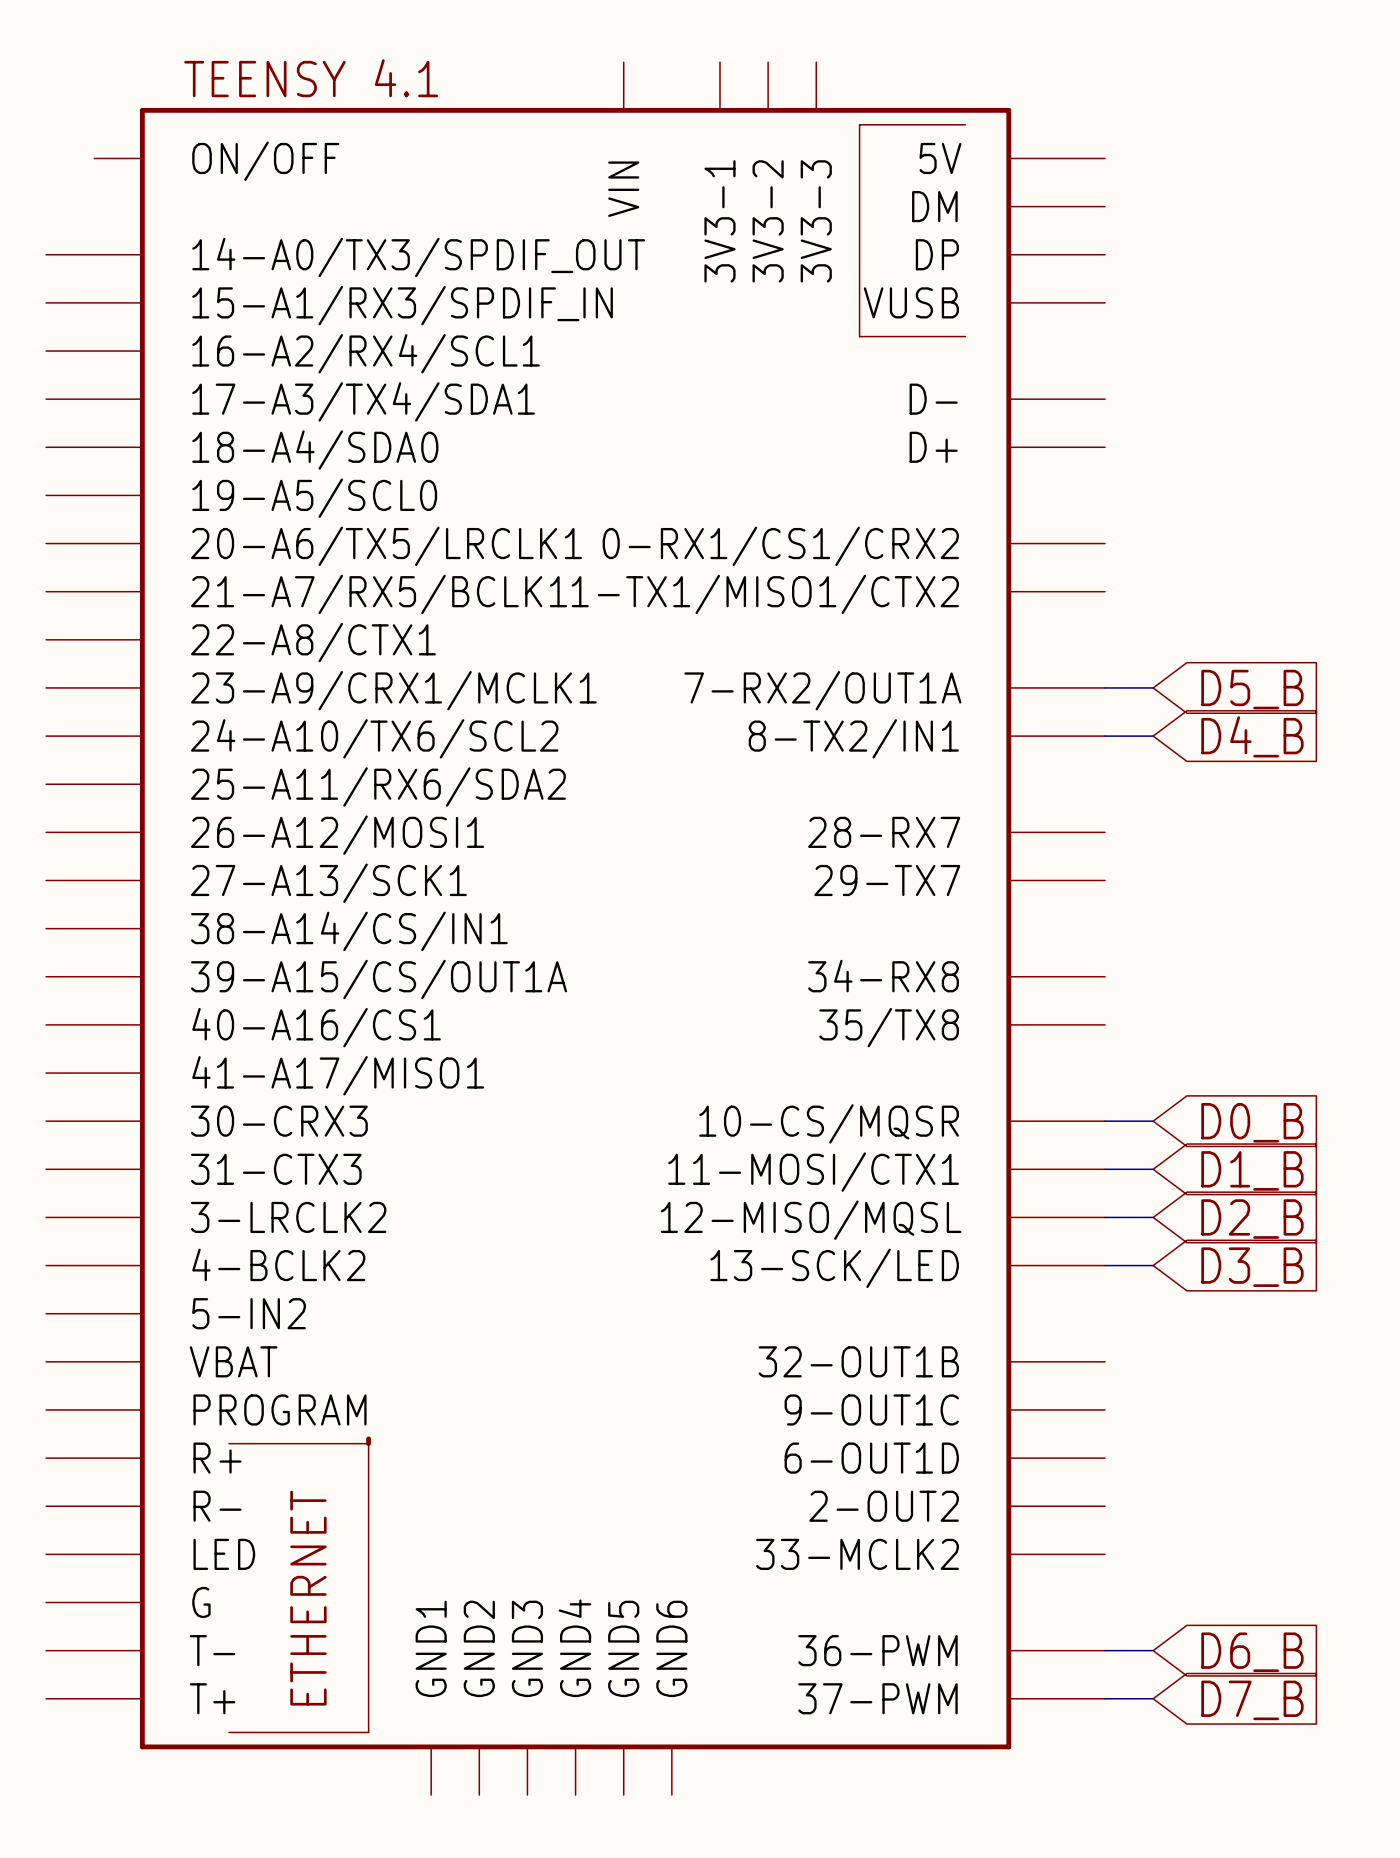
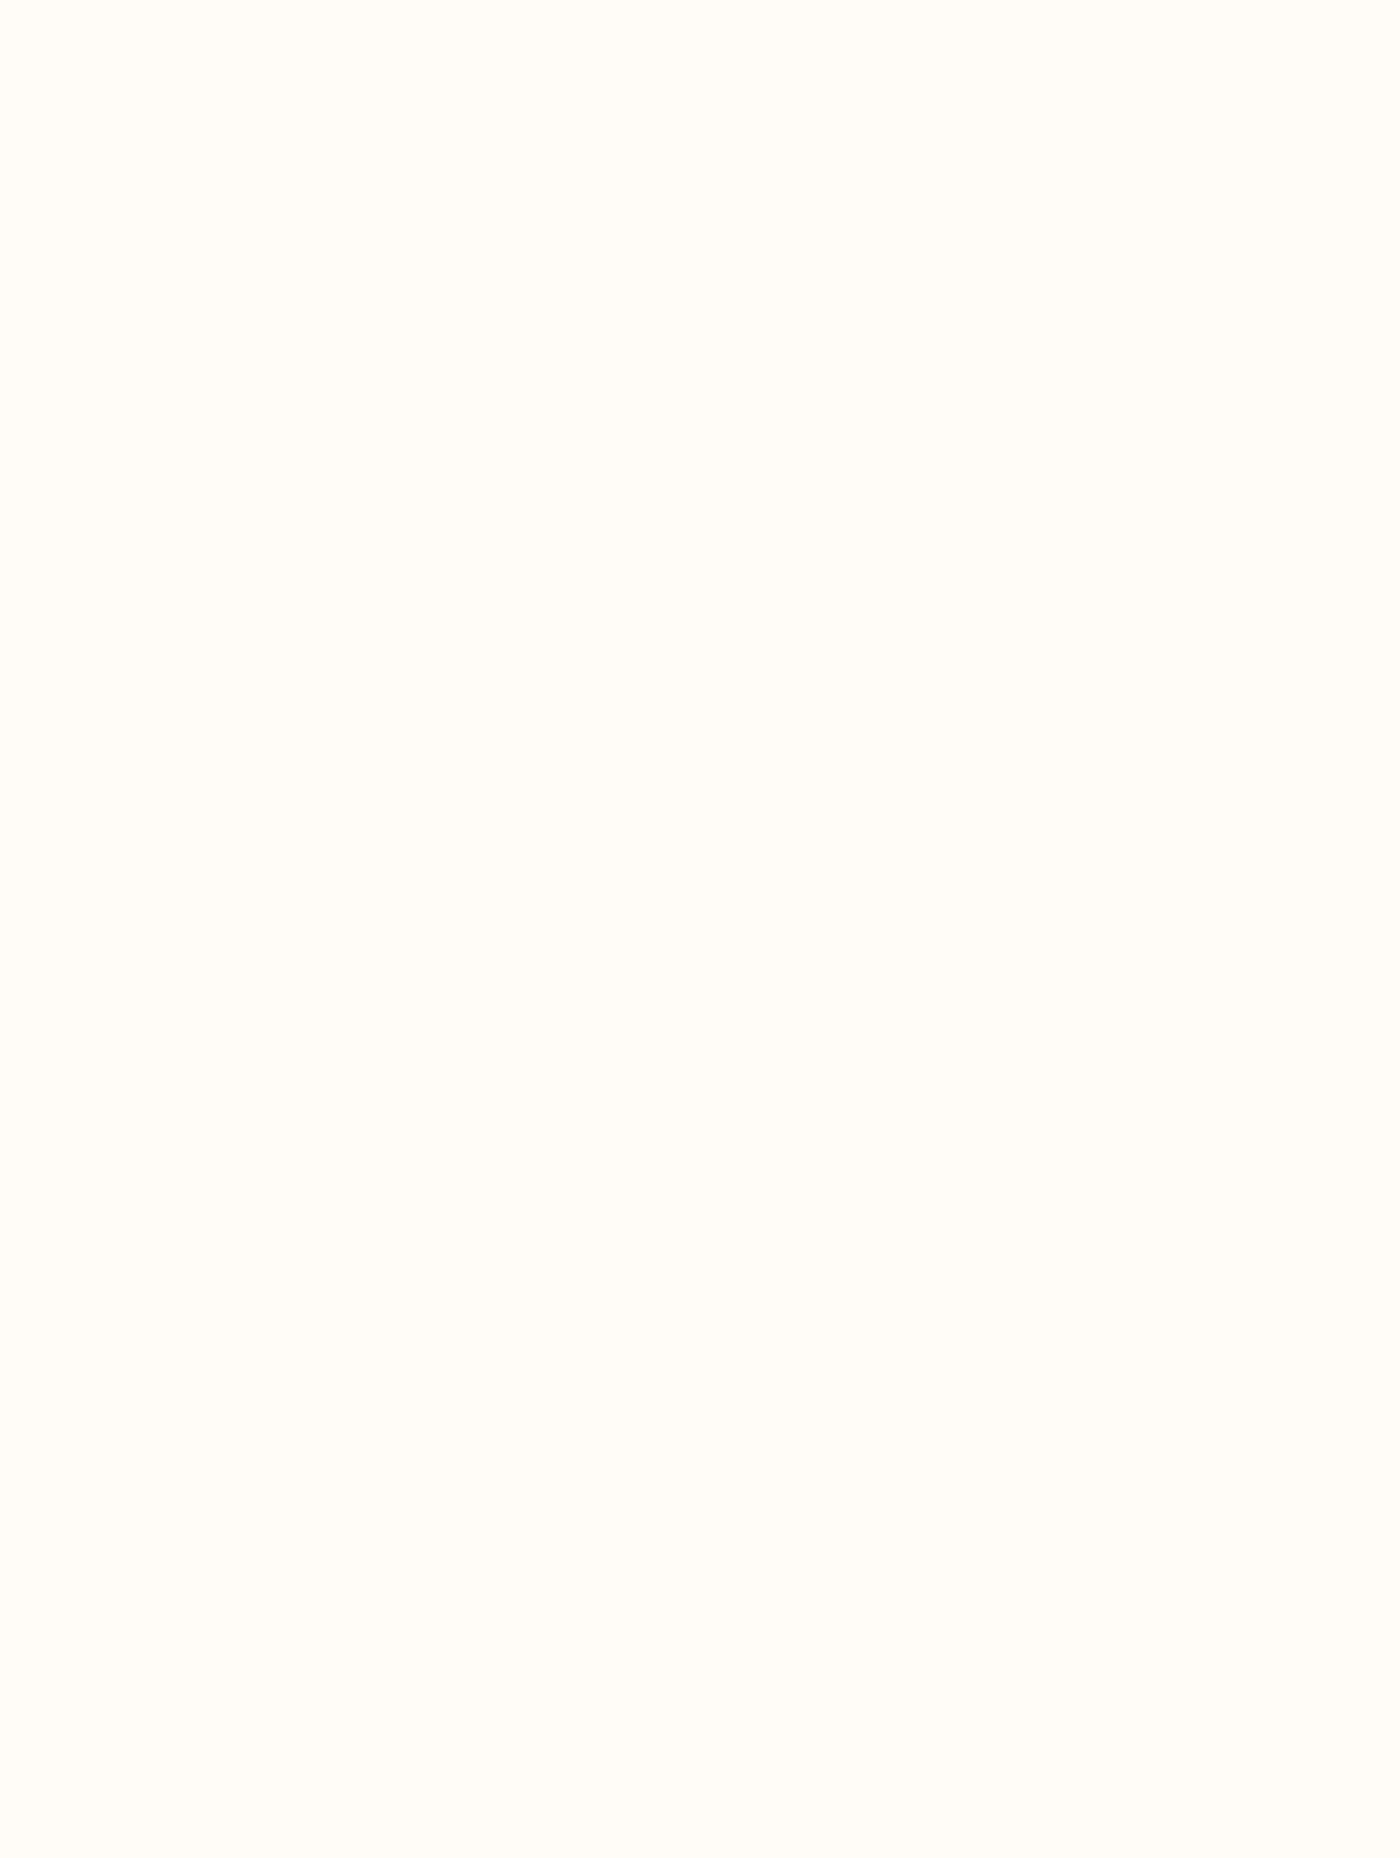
wire: (1105, 687) (1153, 687) -> none
global label: D5_B (1252, 689) -> none
wire: (1105, 736) (1153, 736) -> none
global label: D4_B (1252, 736) -> none
part: (575, 928) -> none
wire: (1105, 1121) (1153, 1121) -> none
global label: D0_B (1252, 1122) -> none
wire: (1105, 1169) (1153, 1169) -> none
global label: D1_B (1252, 1170) -> none
wire: (1105, 1217) (1153, 1217) -> none
global label: D2_B (1252, 1219) -> none
wire: (1105, 1265) (1153, 1265) -> none
global label: D3_B (1252, 1267) -> none
wire: (1105, 1650) (1153, 1650) -> none
global label: D6_B (1252, 1652) -> none
wire: (1105, 1698) (1153, 1698) -> none
global label: D7_B (1252, 1700) -> none

